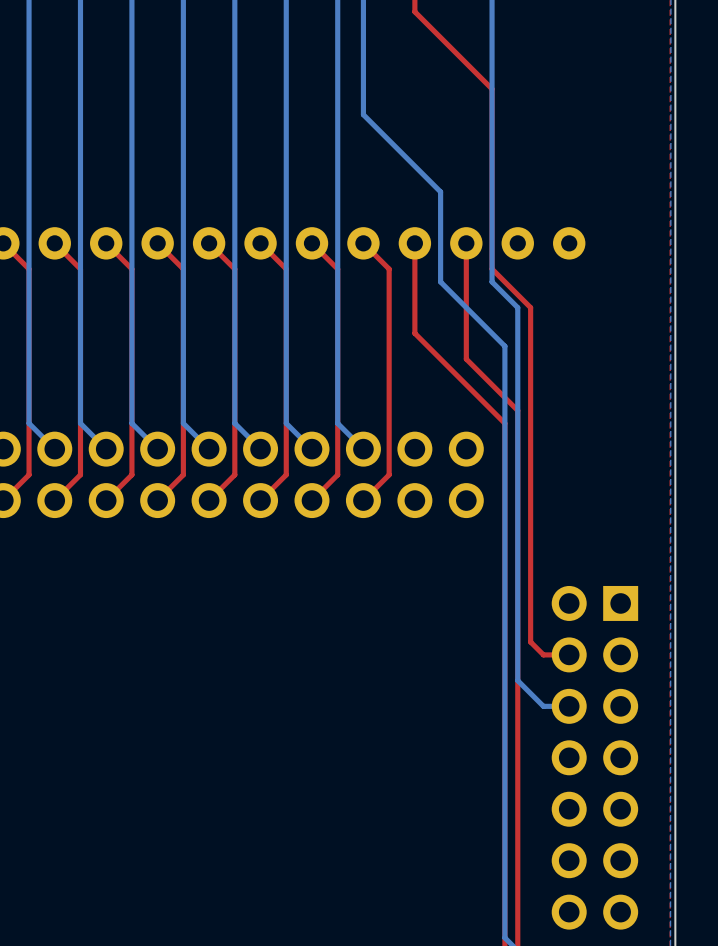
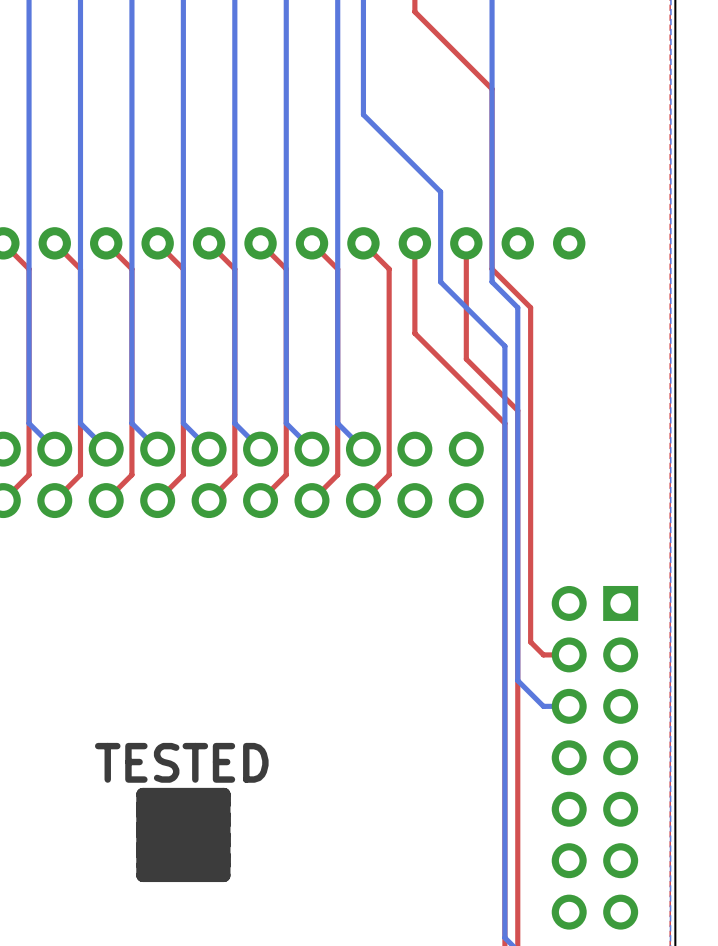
TESTED: none -> (183, 834)

